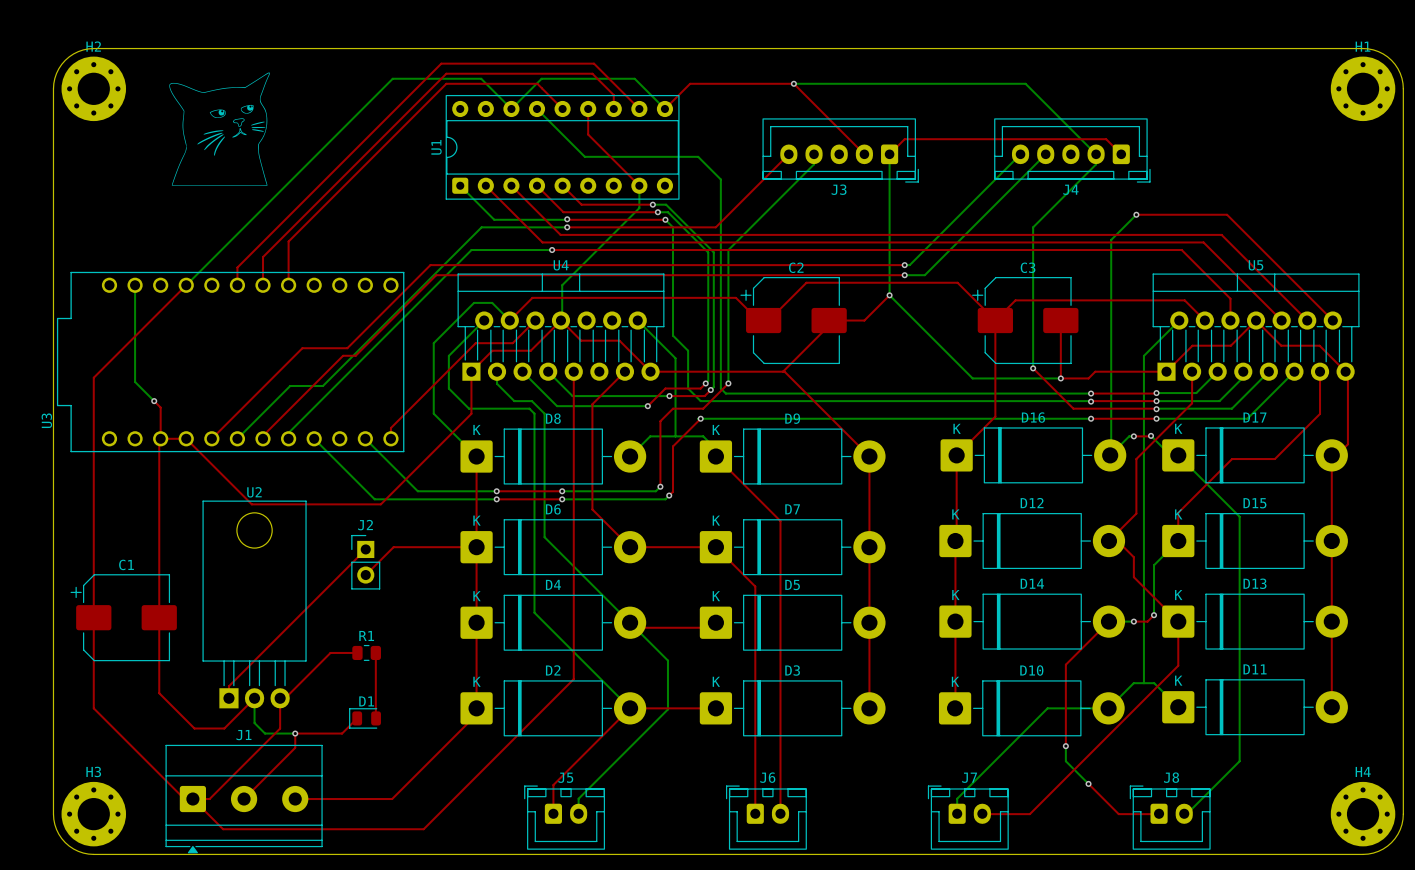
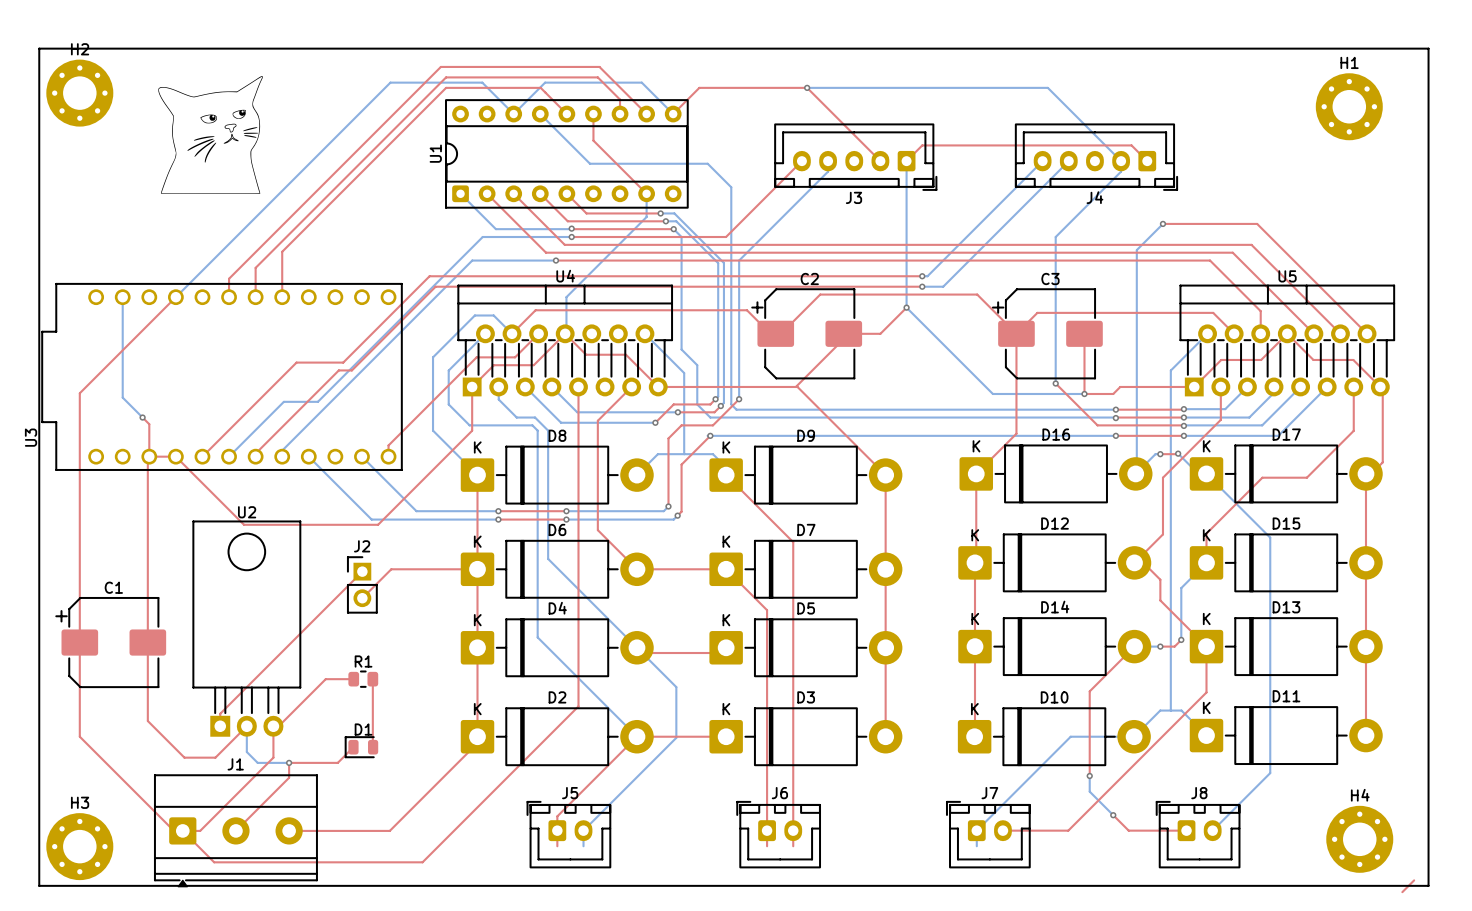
board edge: (93, 48) (1363, 48) (1383, 53) (1397, 68) (1403, 88) (1403, 814) (1397, 834) (1383, 849) (1363, 854) (93, 854) (73, 849) (58, 834) (53, 814) (53, 88) (56, 73) (65, 60) (78, 51) (93, 48) -> (39, 48) (39, 885) (1428, 885) (1428, 48) (39, 48)
H1 position: (1363, 88) -> (1349, 106)
bottom track: (1239, 743) (1239, 761) (1187, 813) (1184, 813) -> (1270, 773) (1212, 830)
top track: (1045, 798) (1029, 814) (982, 813) -> (1068, 830) (1002, 830)
top track: (1103, 798) (1118, 814) (1159, 813) -> (1128, 830) (1186, 830)
H4 position: (1363, 814) -> (1359, 839)
J5 position: (564, 817) -> (568, 834)
J6 position: (766, 817) -> (778, 834)
J7 position: (968, 817) -> (988, 834)
J8 position: (1170, 817) -> (1198, 834)
top track: none -> (1414, 880) (1402, 892)

